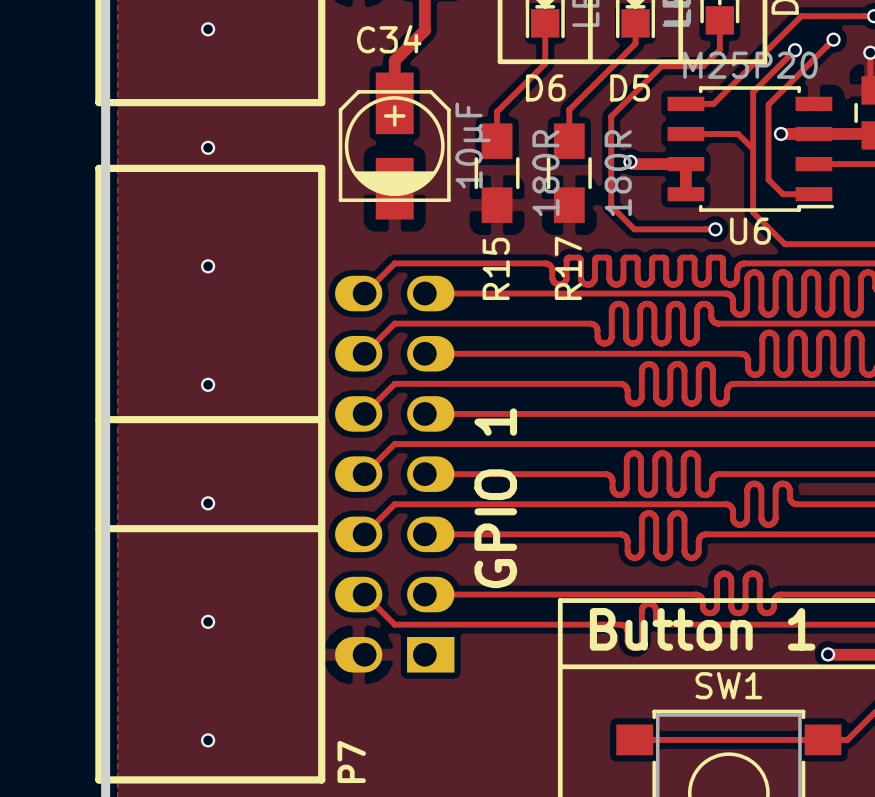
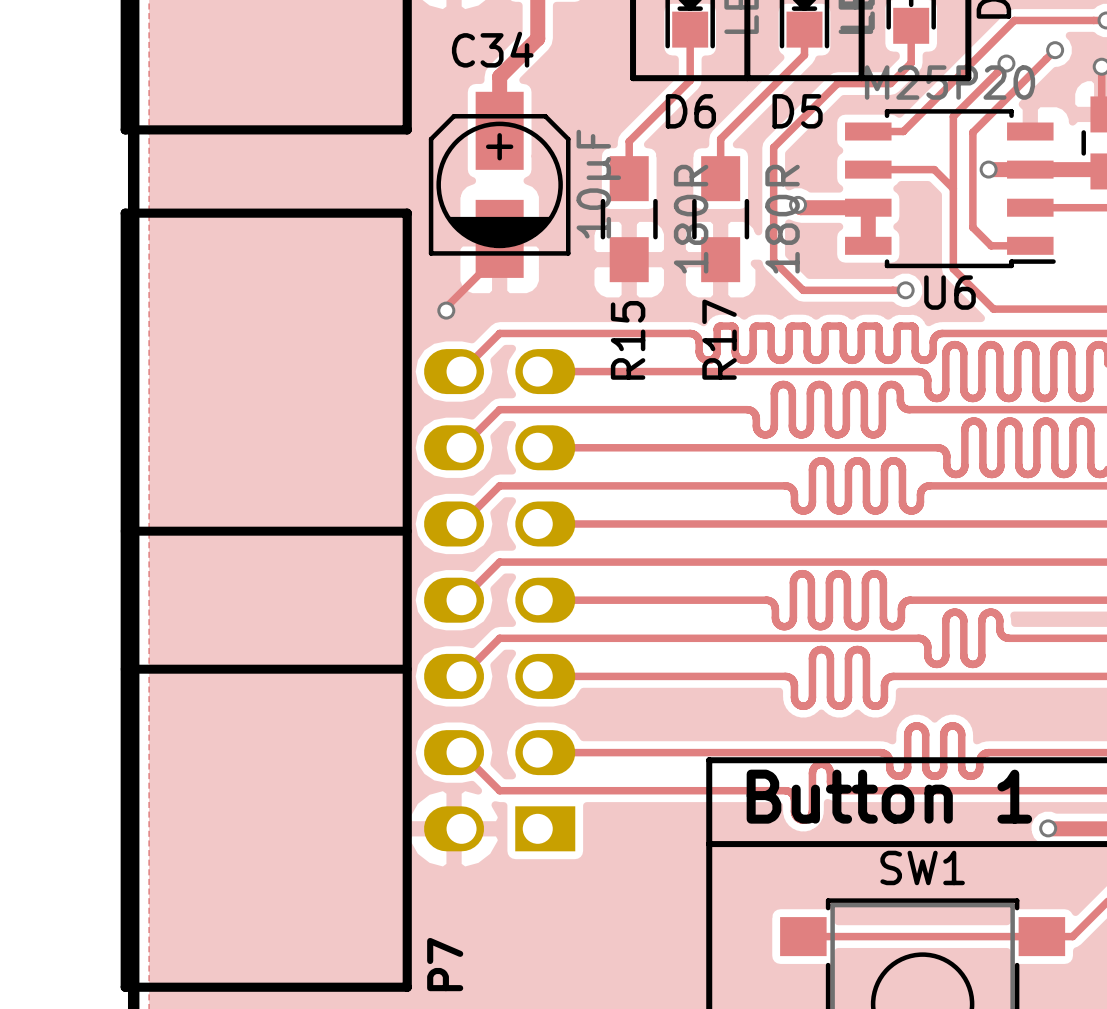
via: (208, 29) -> none
via: (208, 147) -> none
track: none -> (499, 253) (446, 307) (446, 310)
via: none -> (446, 310)
via: (208, 266) -> none
via: (208, 384) -> none
text: GPIO 1 (495, 498) -> none
via: (208, 503) -> none
via: (208, 621) -> none
via: (208, 740) -> none

